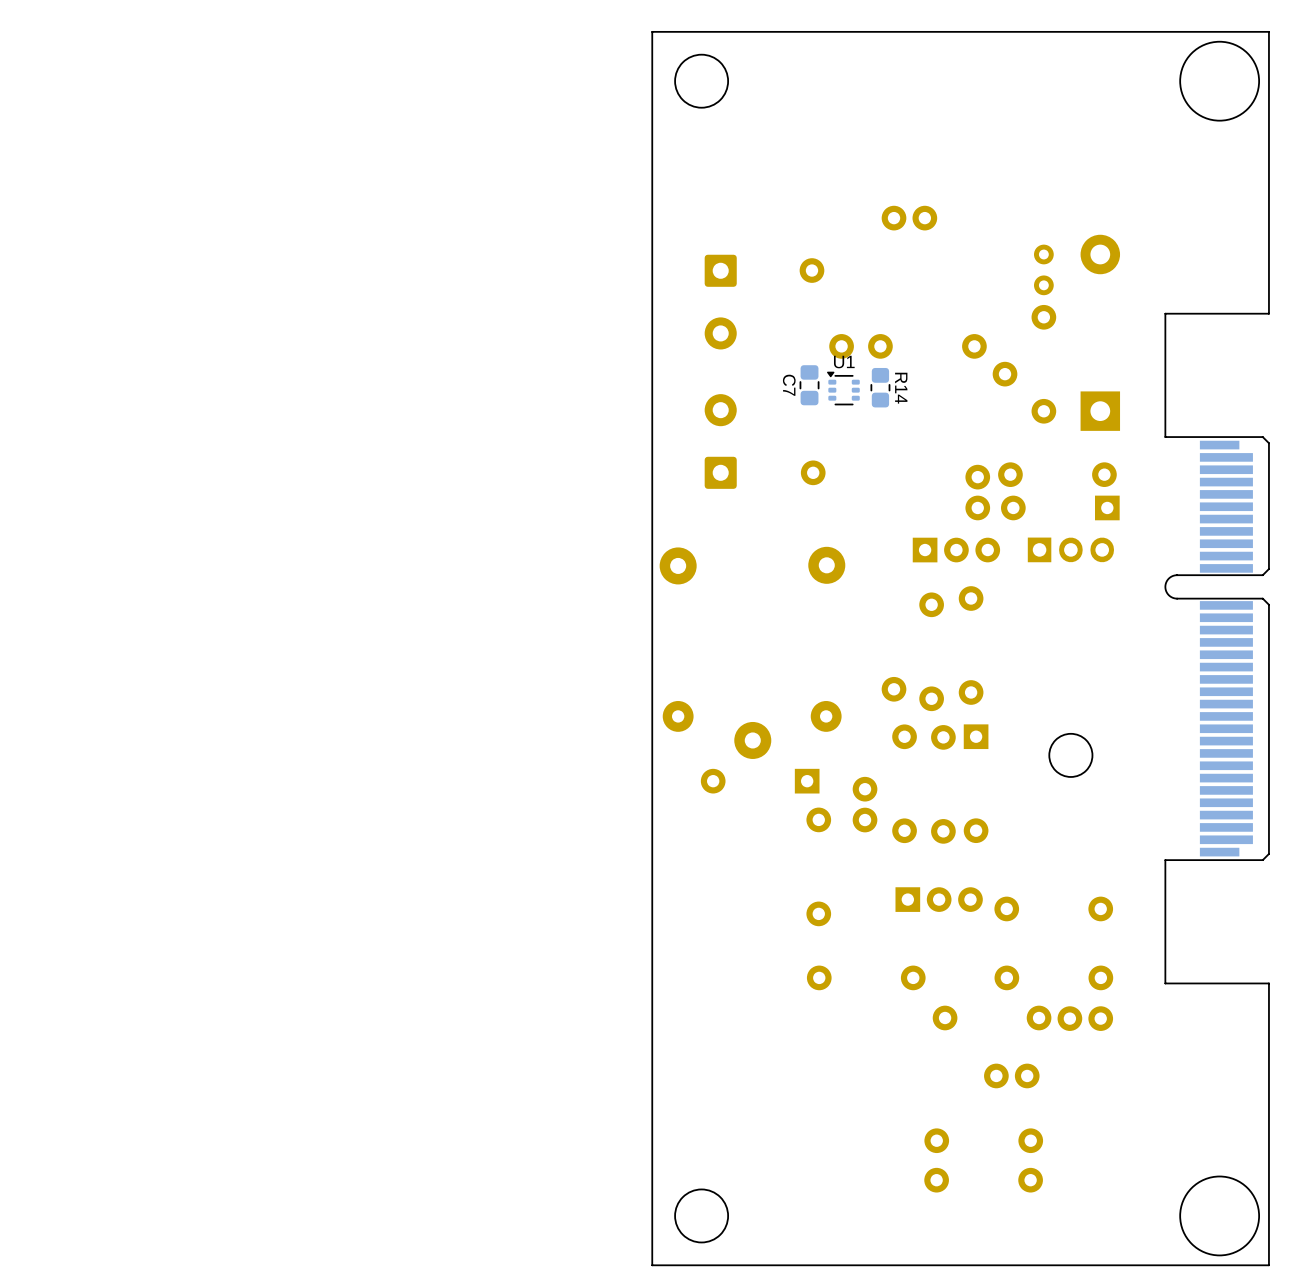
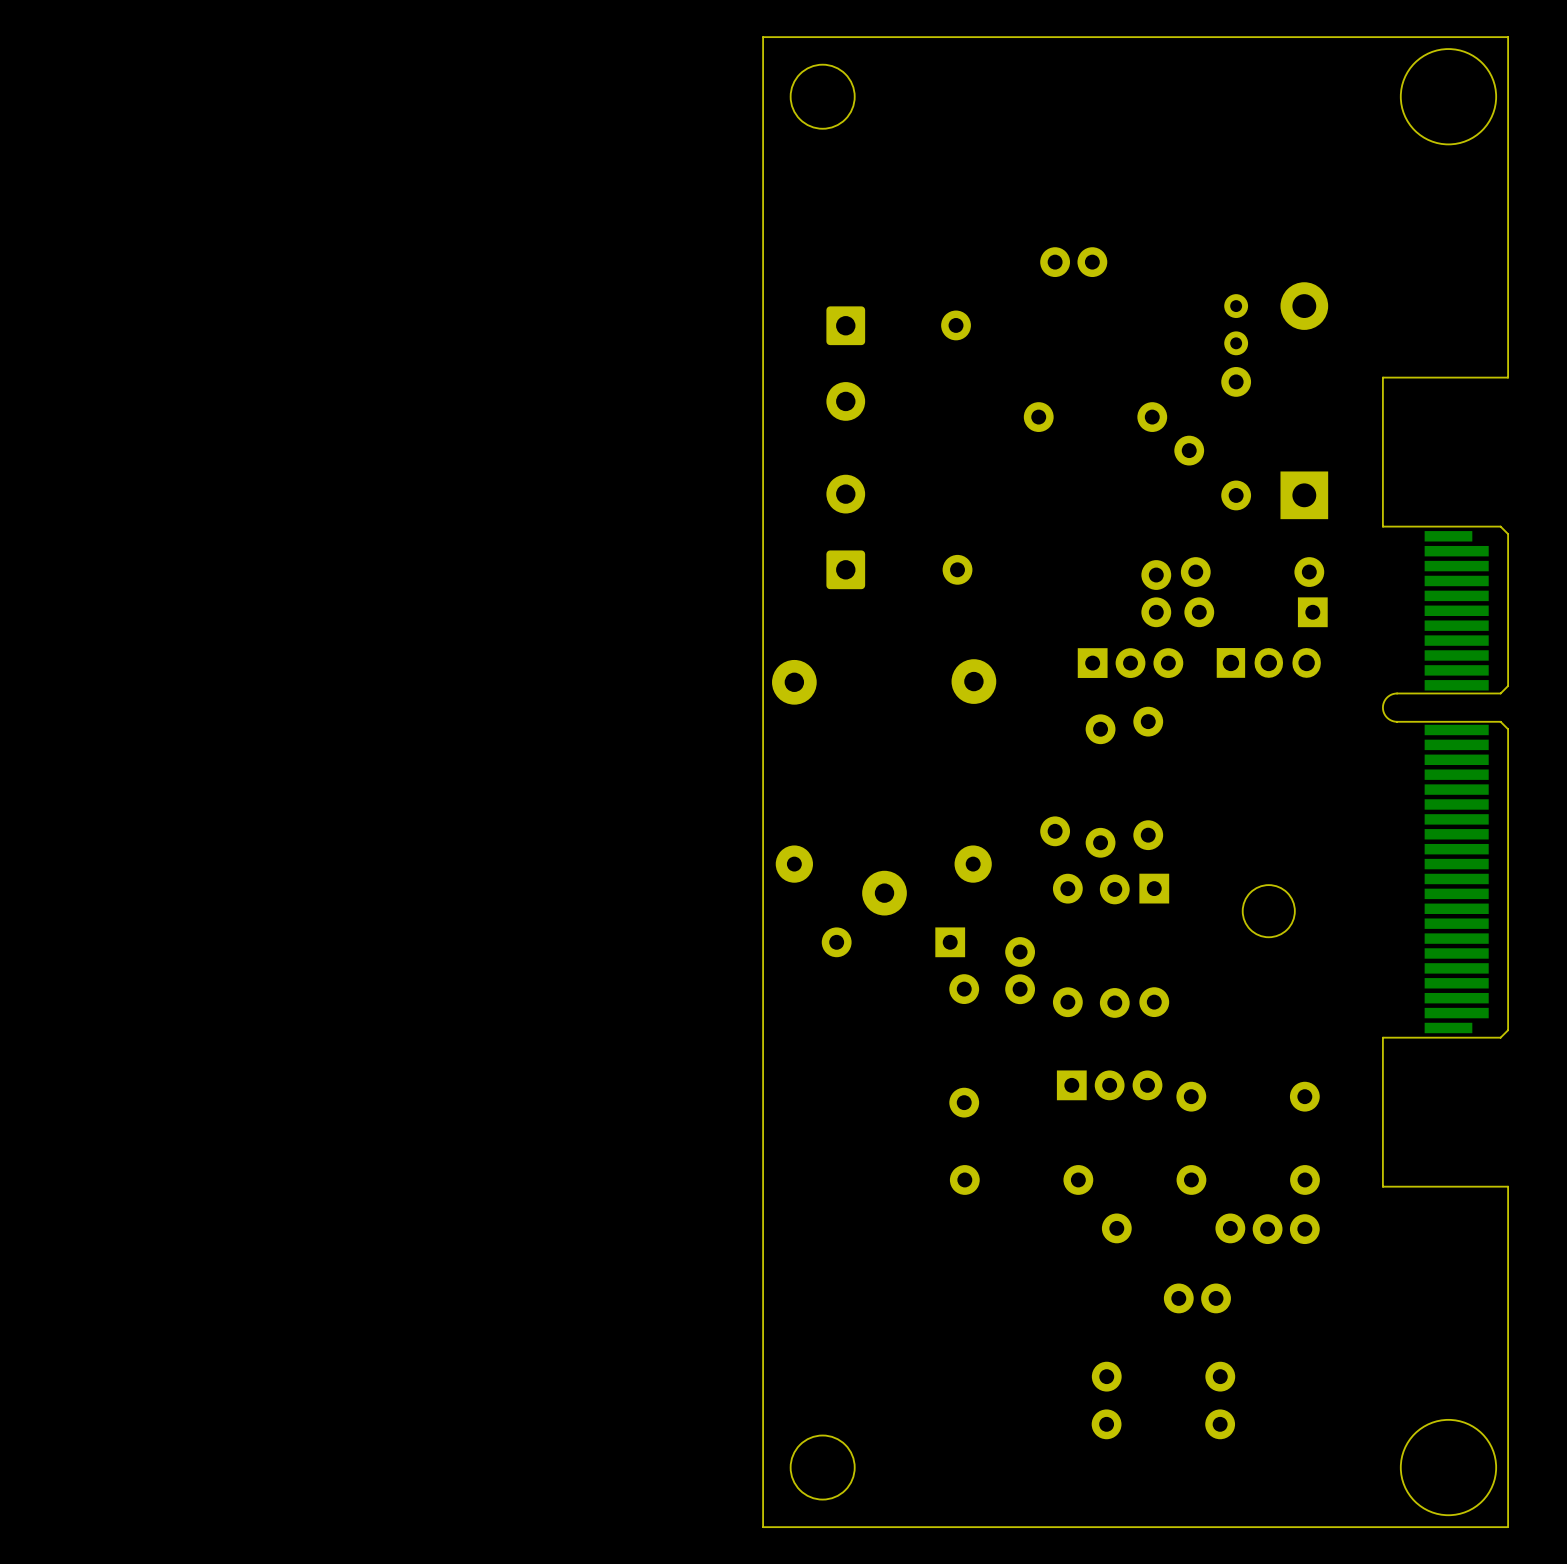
part: (841, 346) -> none
C7: (809, 385) -> none
R14: (880, 387) -> none
U1: (843, 388) -> none

